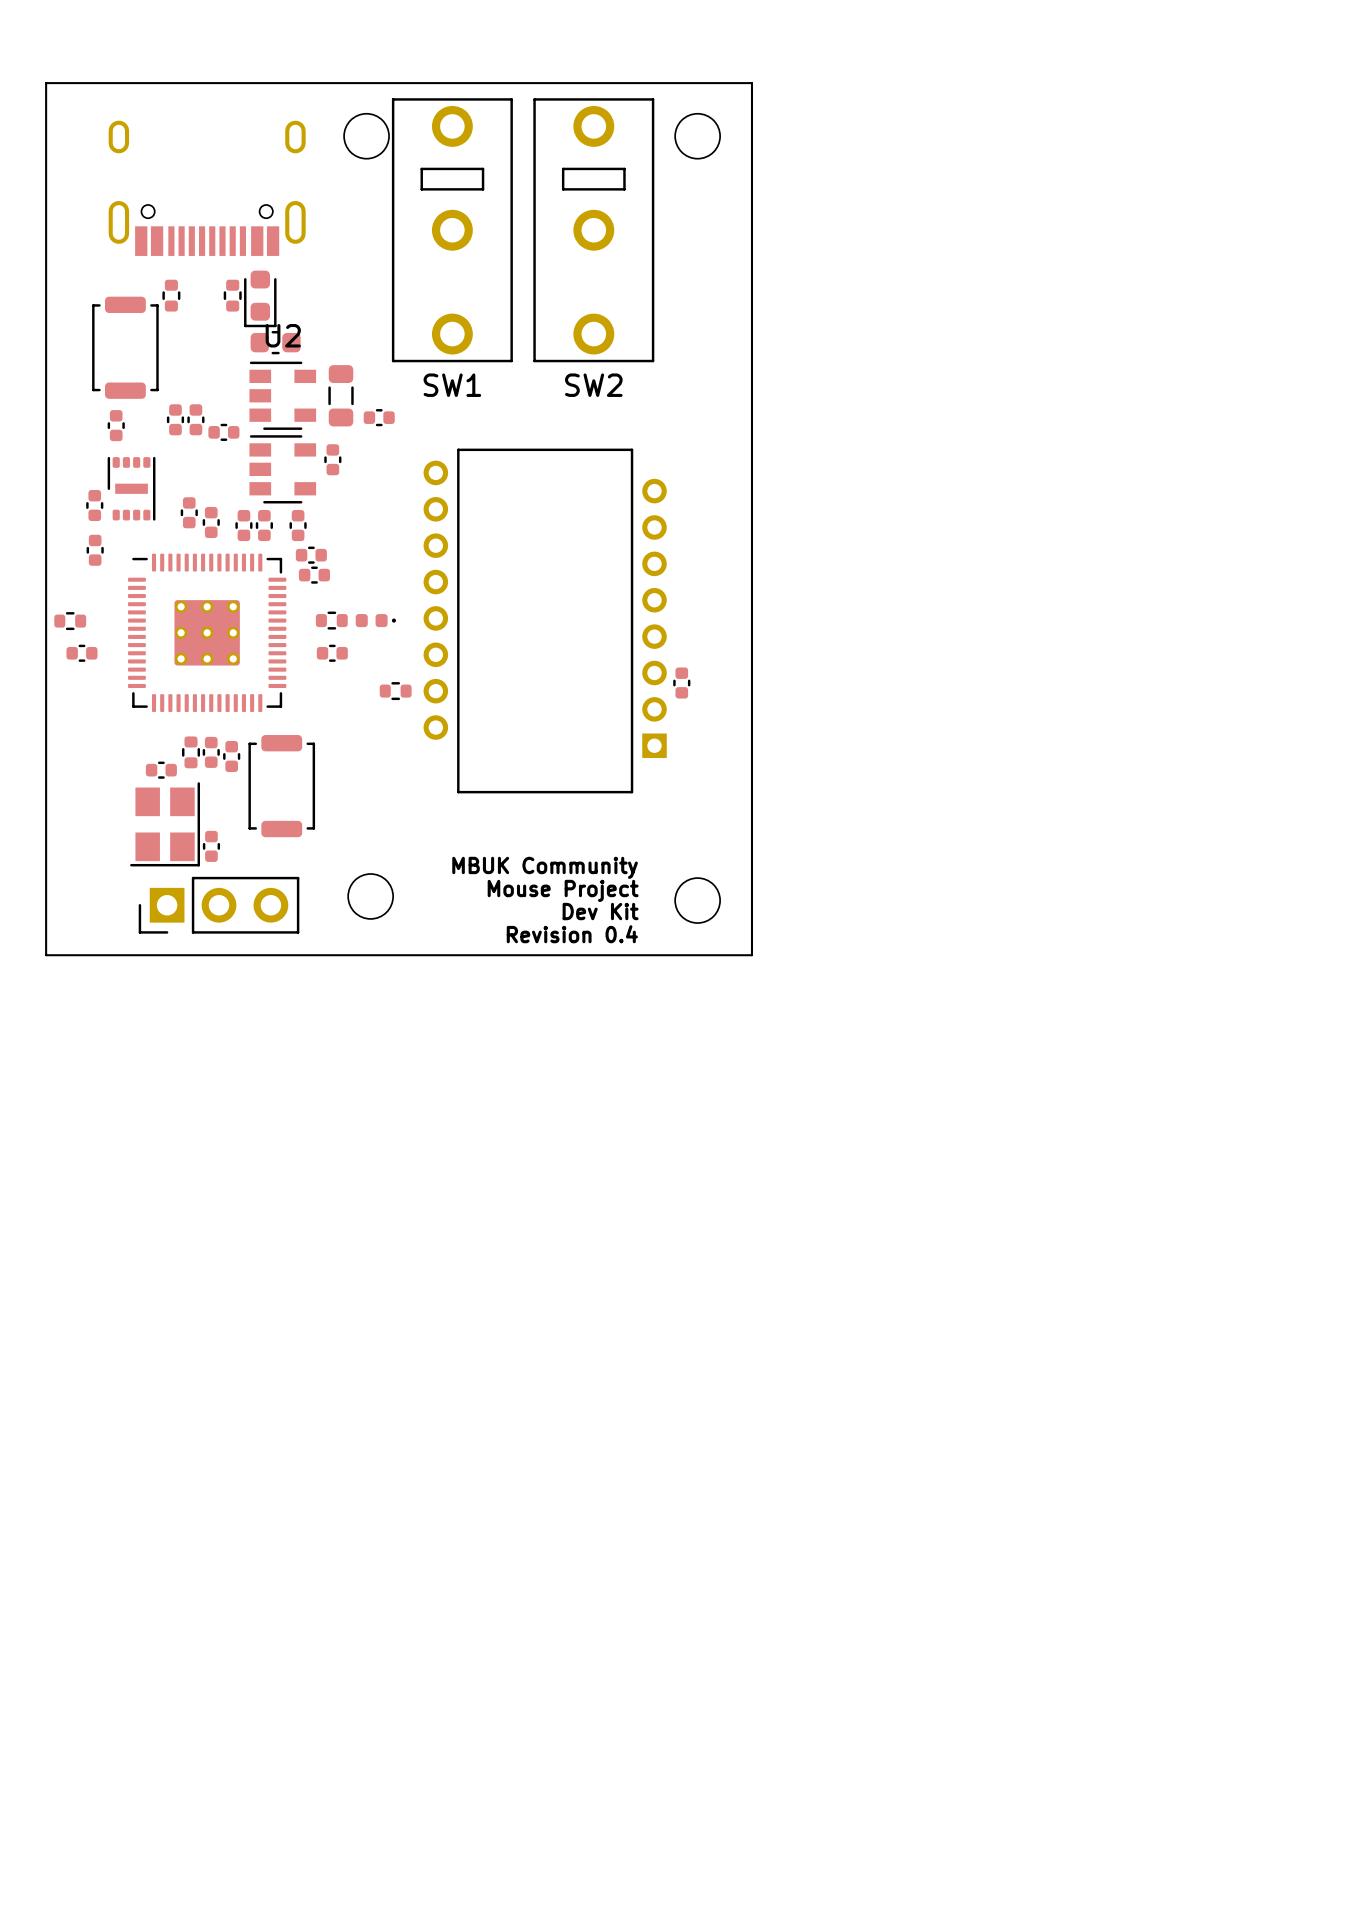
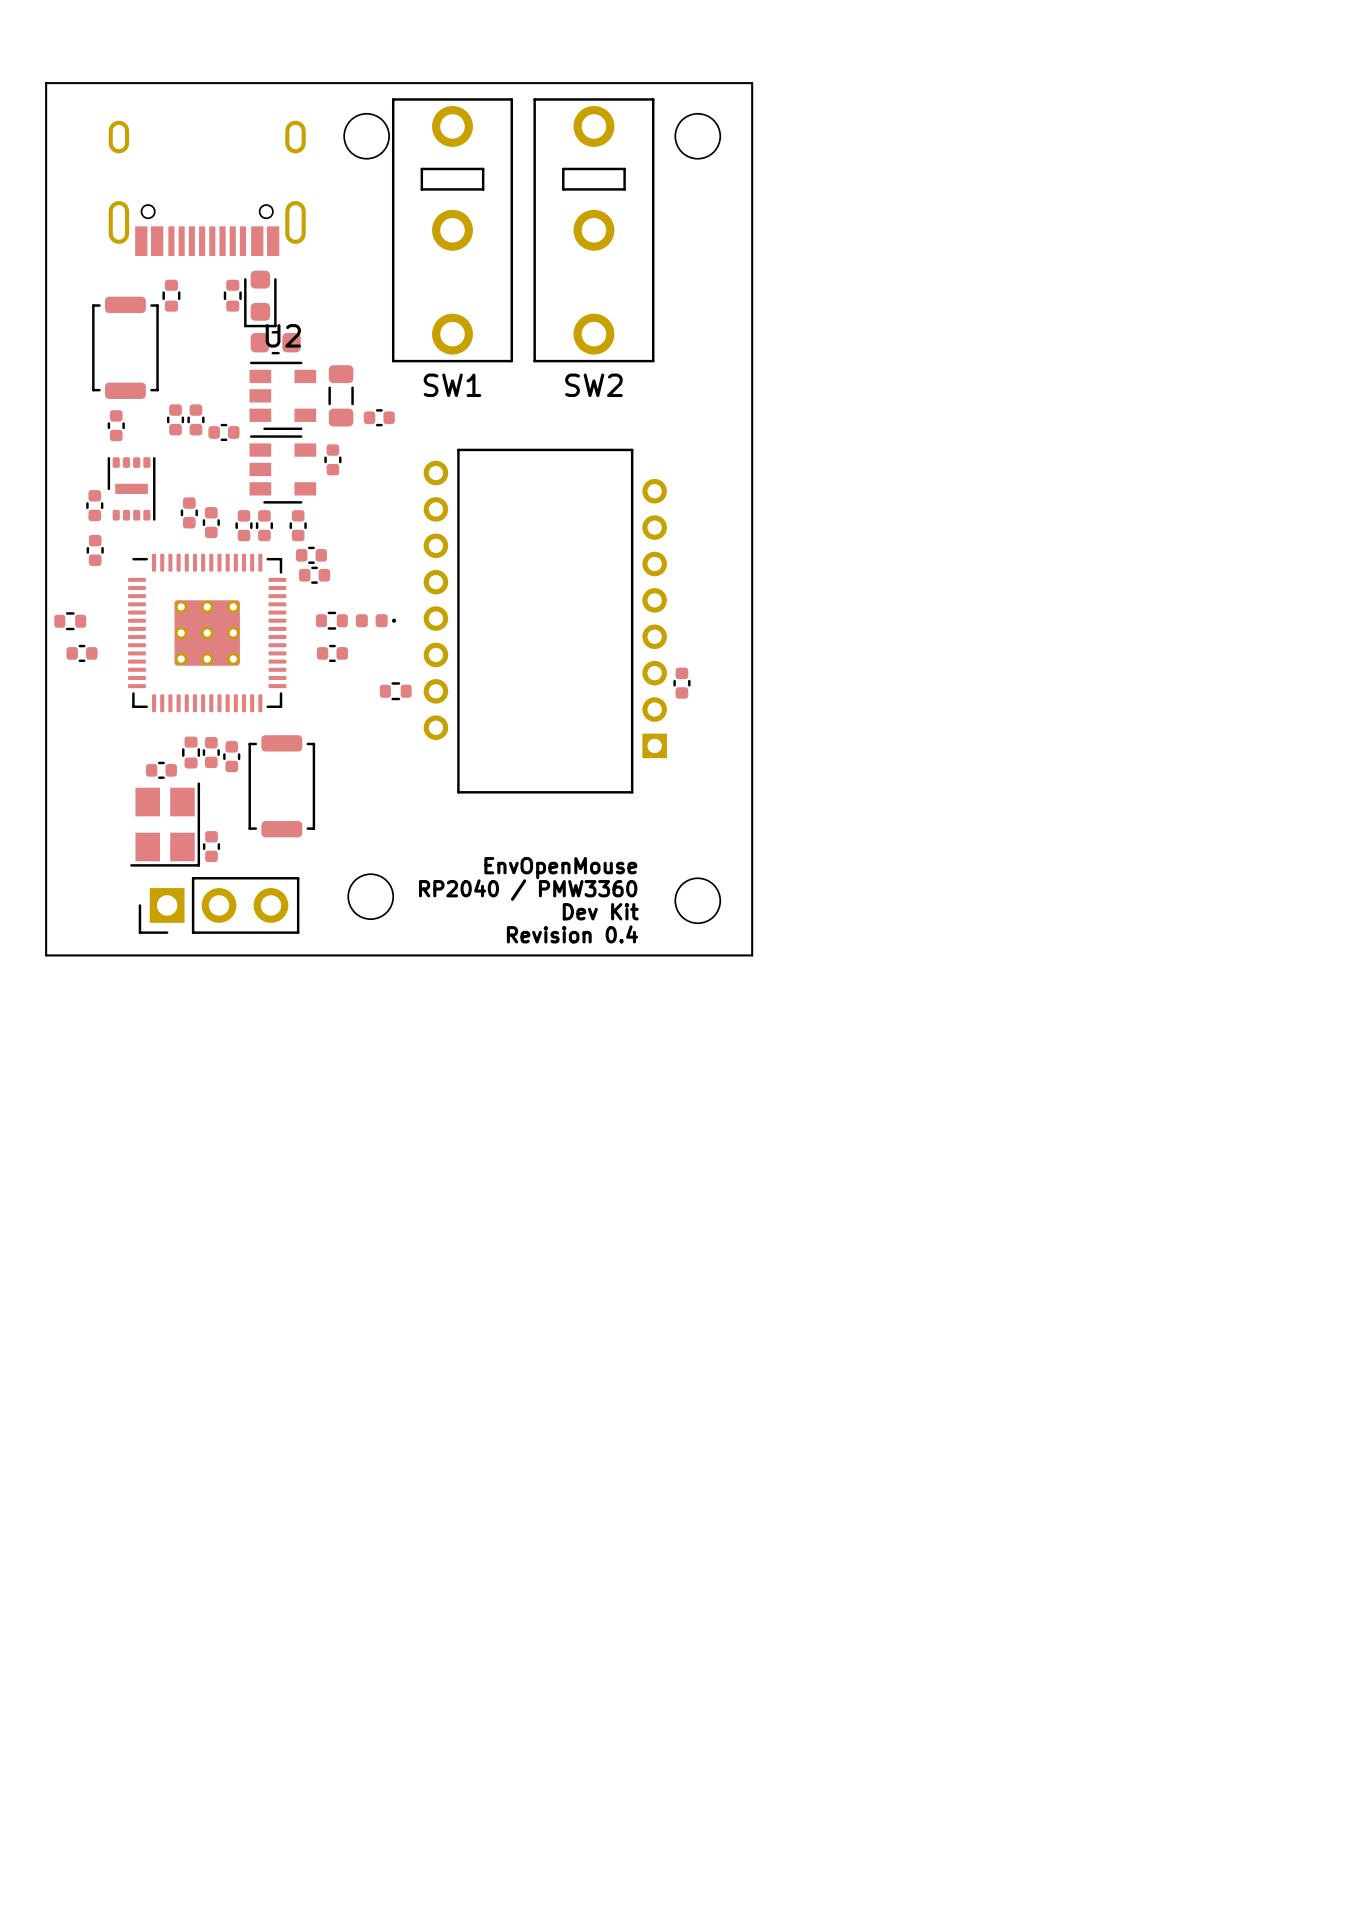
text: MBUK Community (545, 867) -> EnvOpenMouse (560, 868)
text: Mouse Project (563, 890) -> RP2040 / PMW3360 (528, 890)

